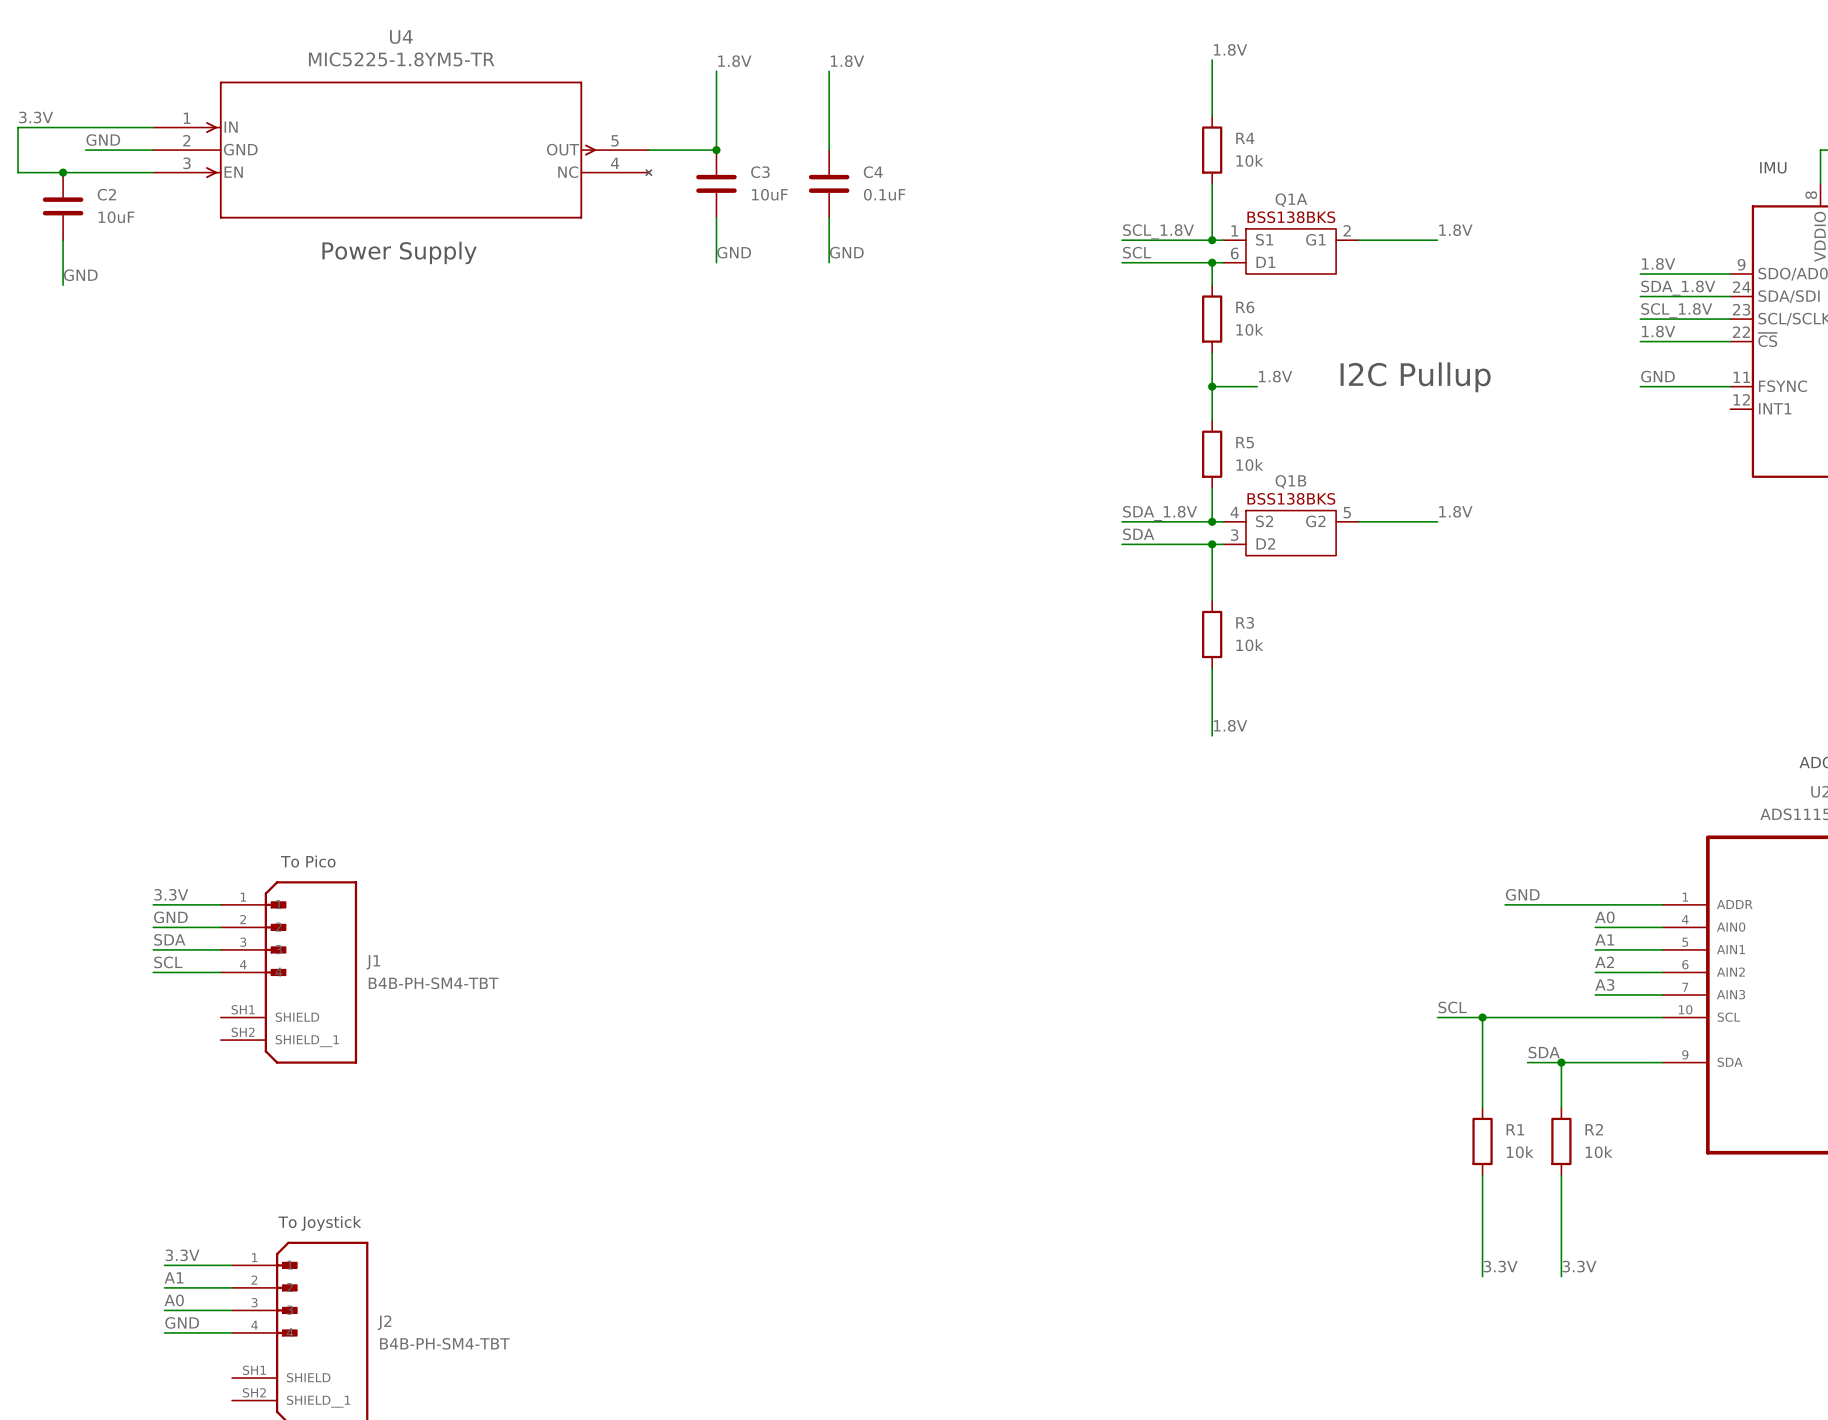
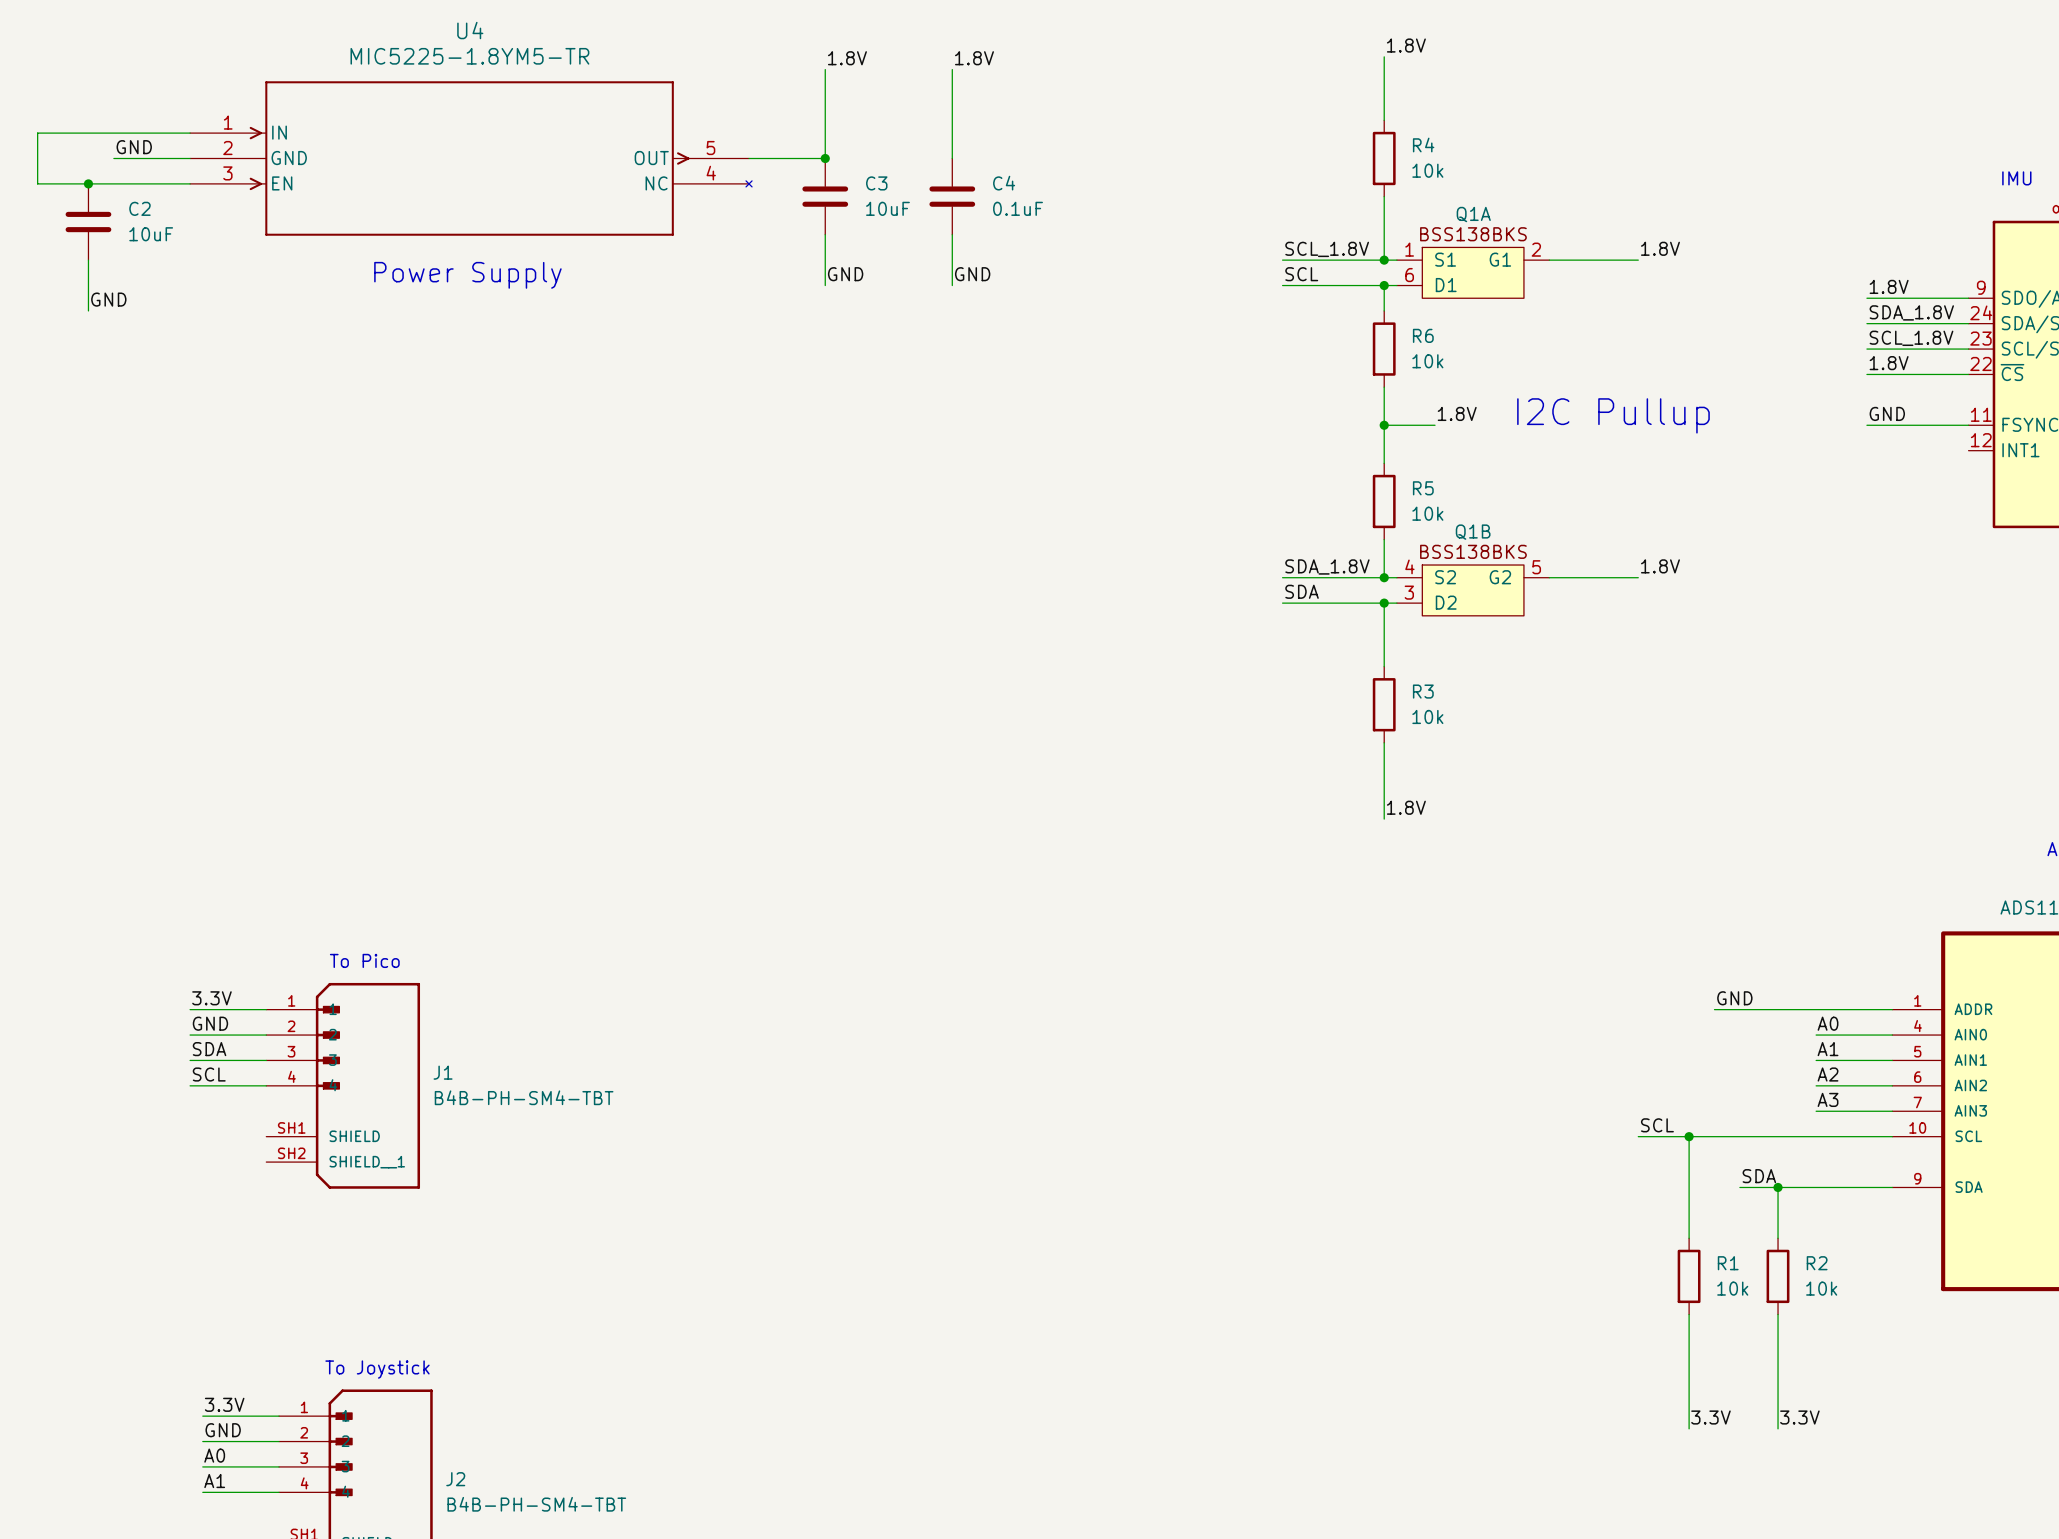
label: 3.3V (36, 117) -> none
label: A1 (174, 1277) -> GND (223, 1430)
label: GND (182, 1322) -> A1 (214, 1481)

